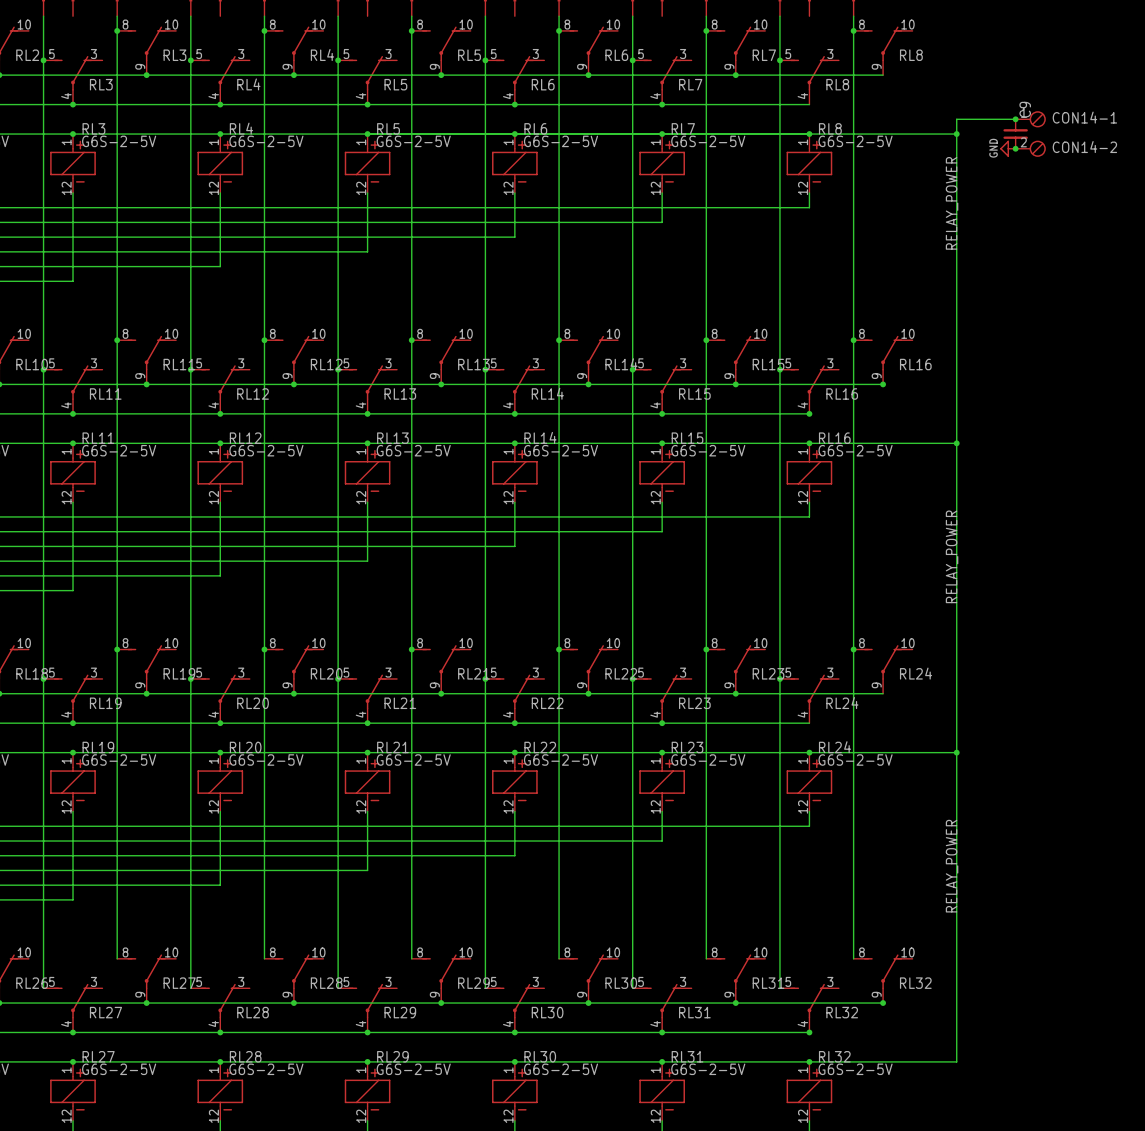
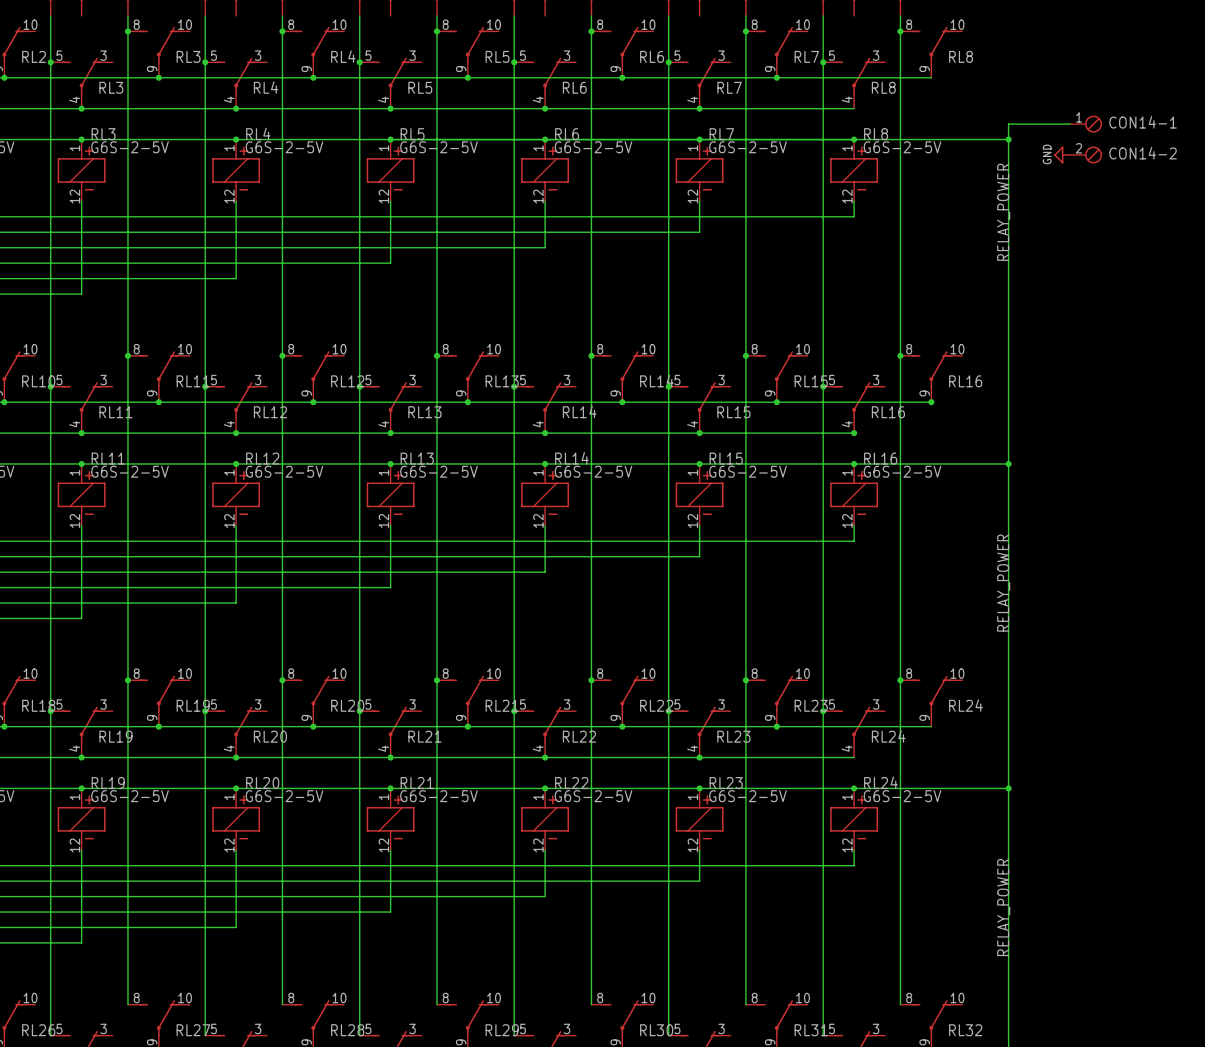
junction: (1015, 119) -> none
C9: (1015, 134) -> none
junction: (1015, 148) -> none

